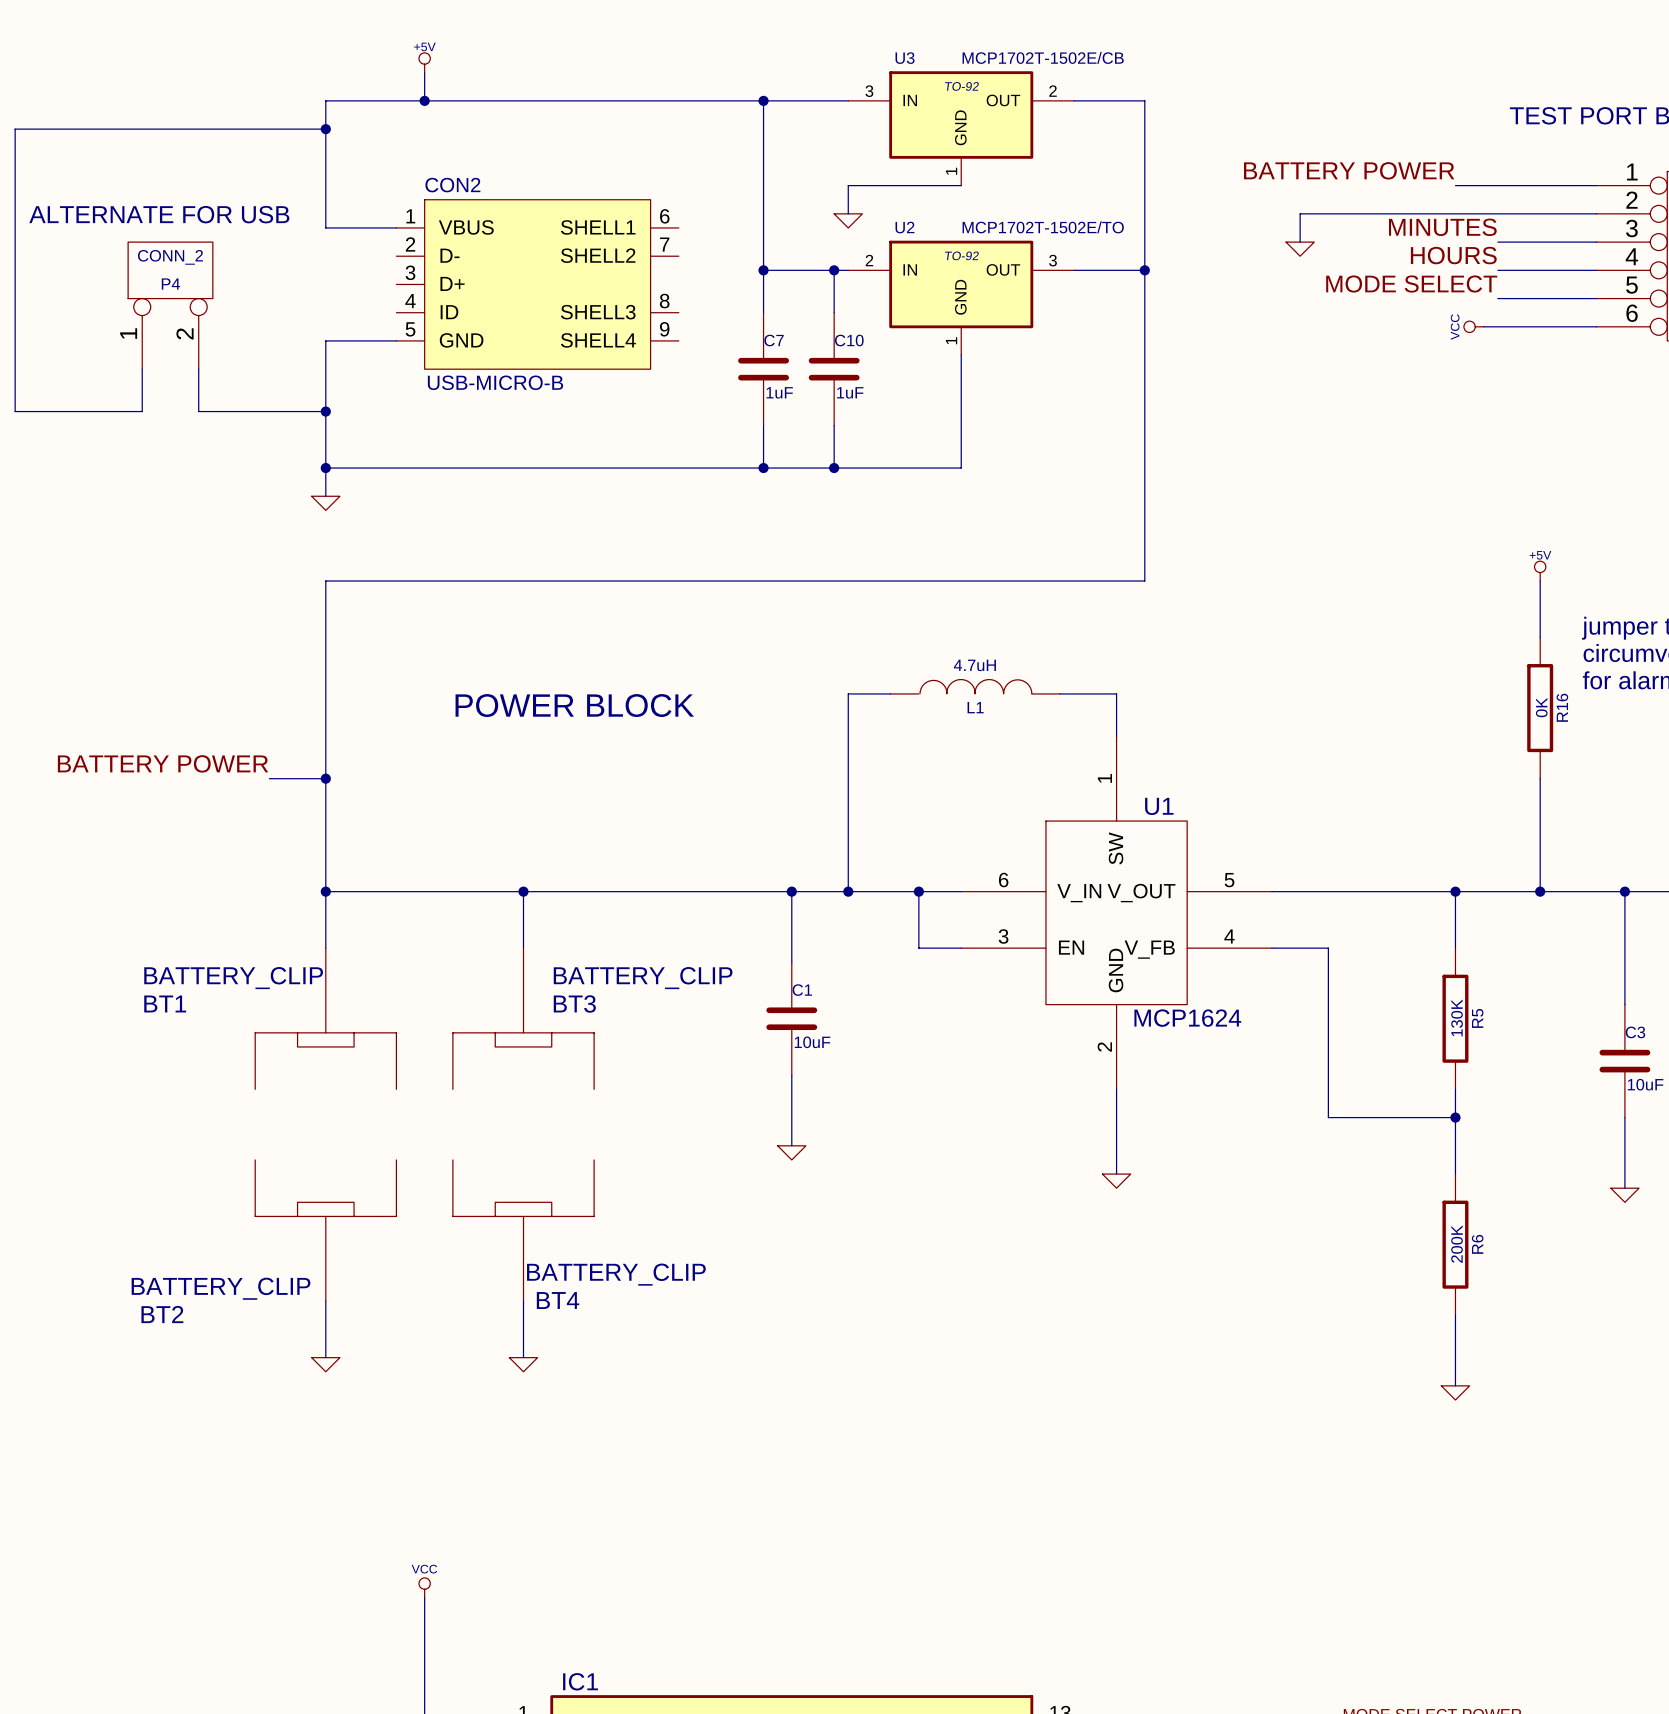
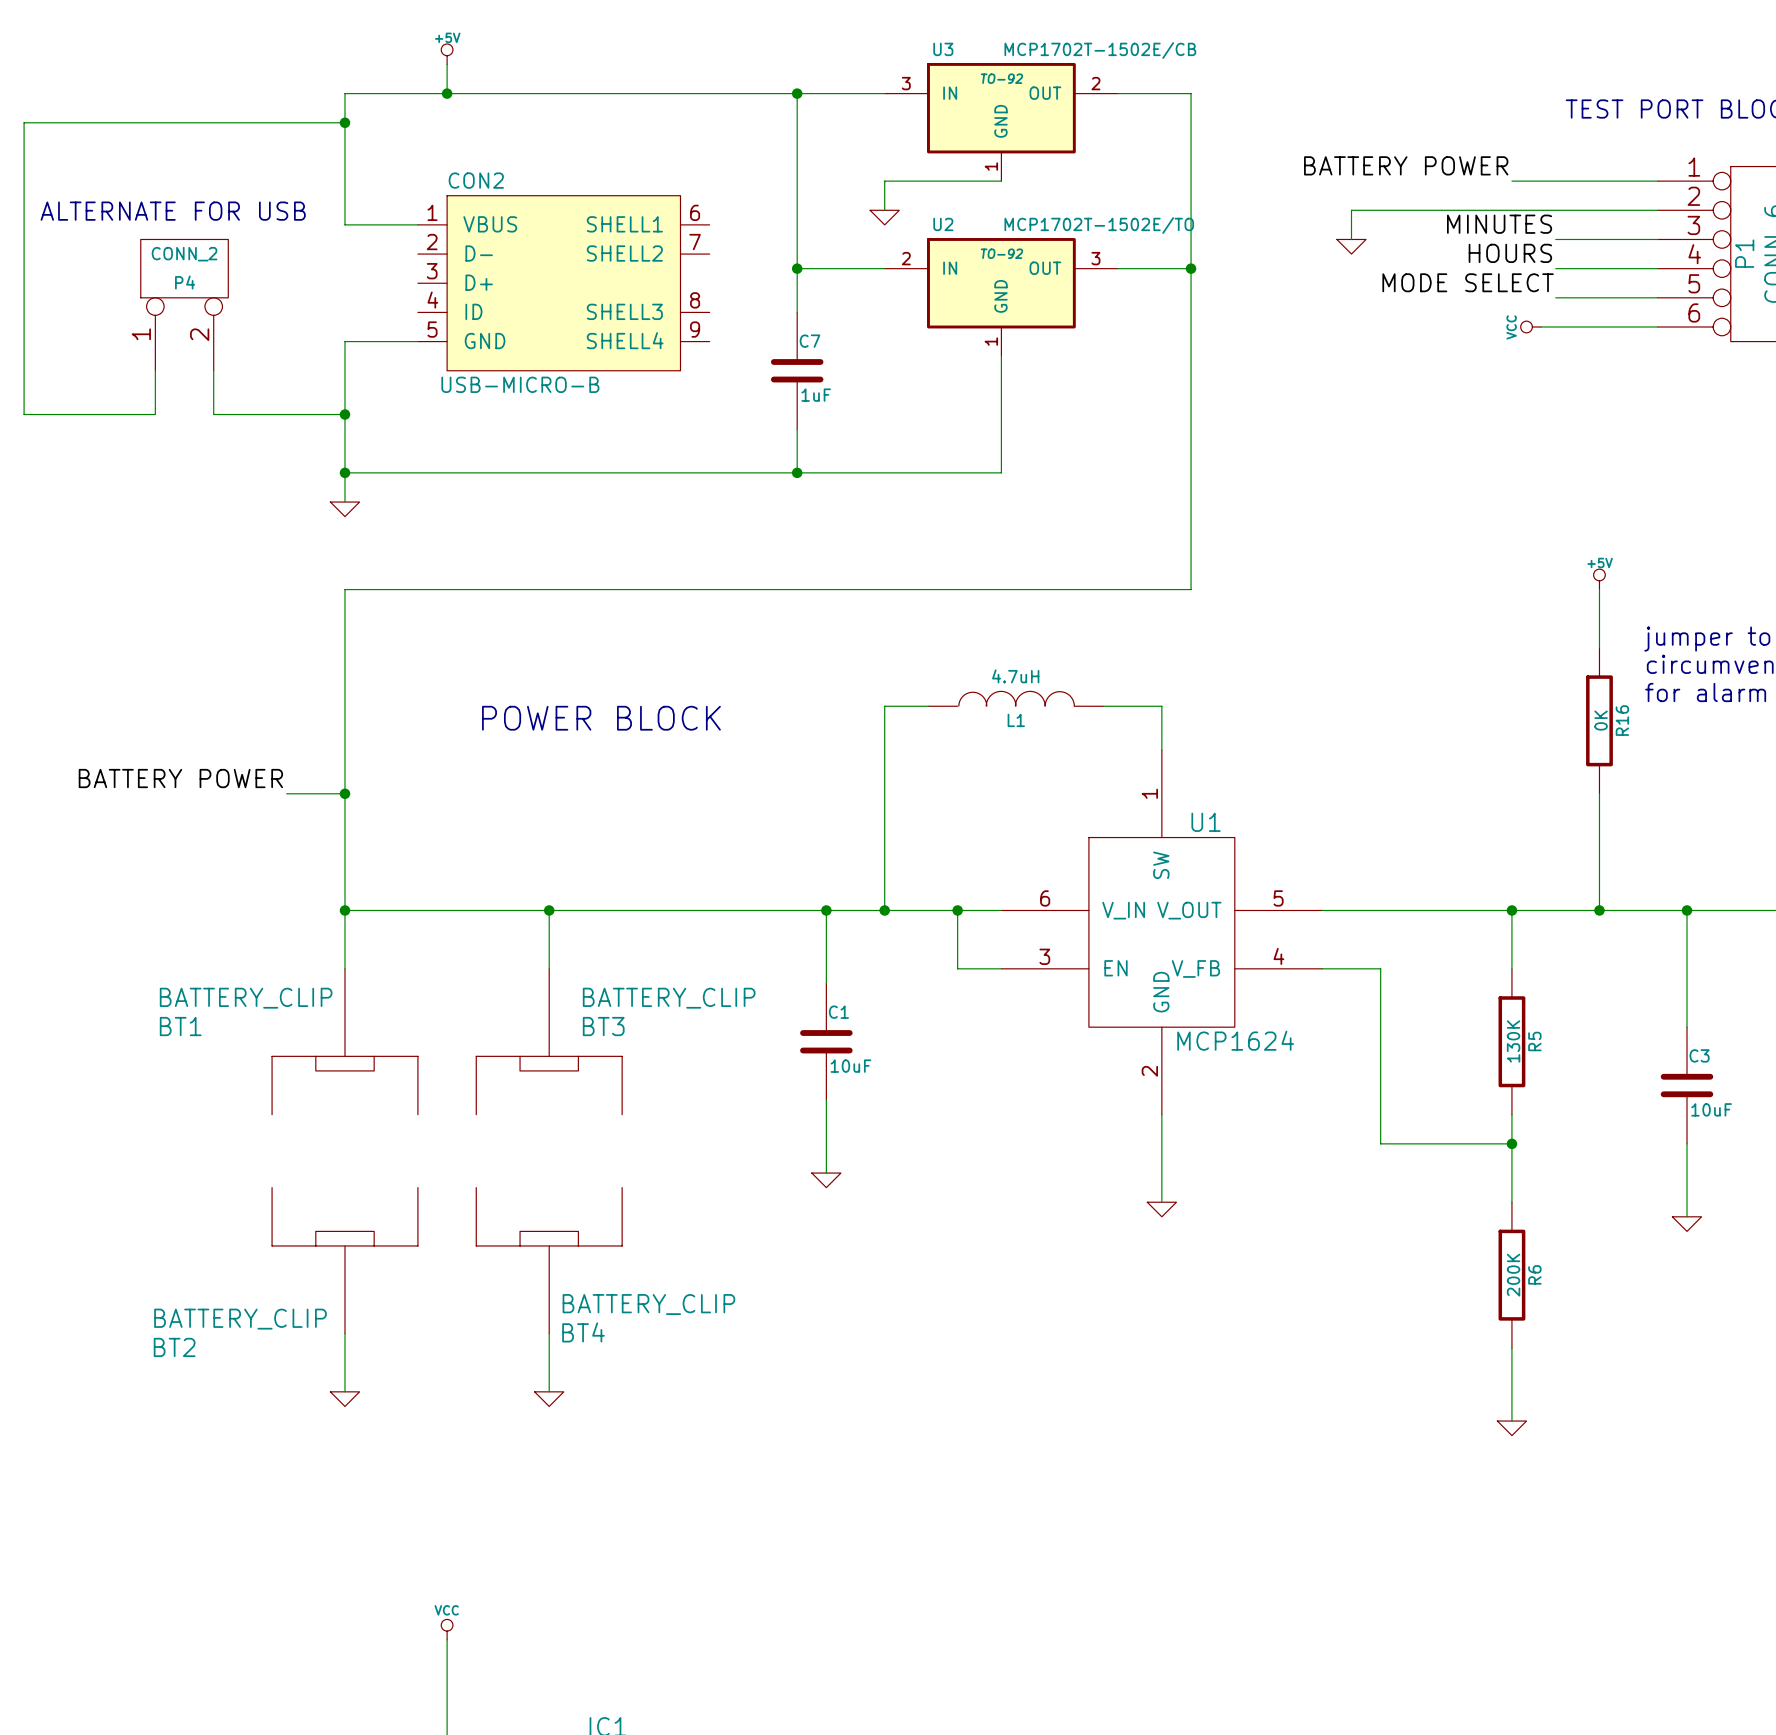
wire: (834, 270) (834, 312) -> none
junction: (834, 270) -> none
C10: 1uF (834, 369) -> none
wire: (834, 425) (834, 468) -> none
junction: (834, 468) -> none

